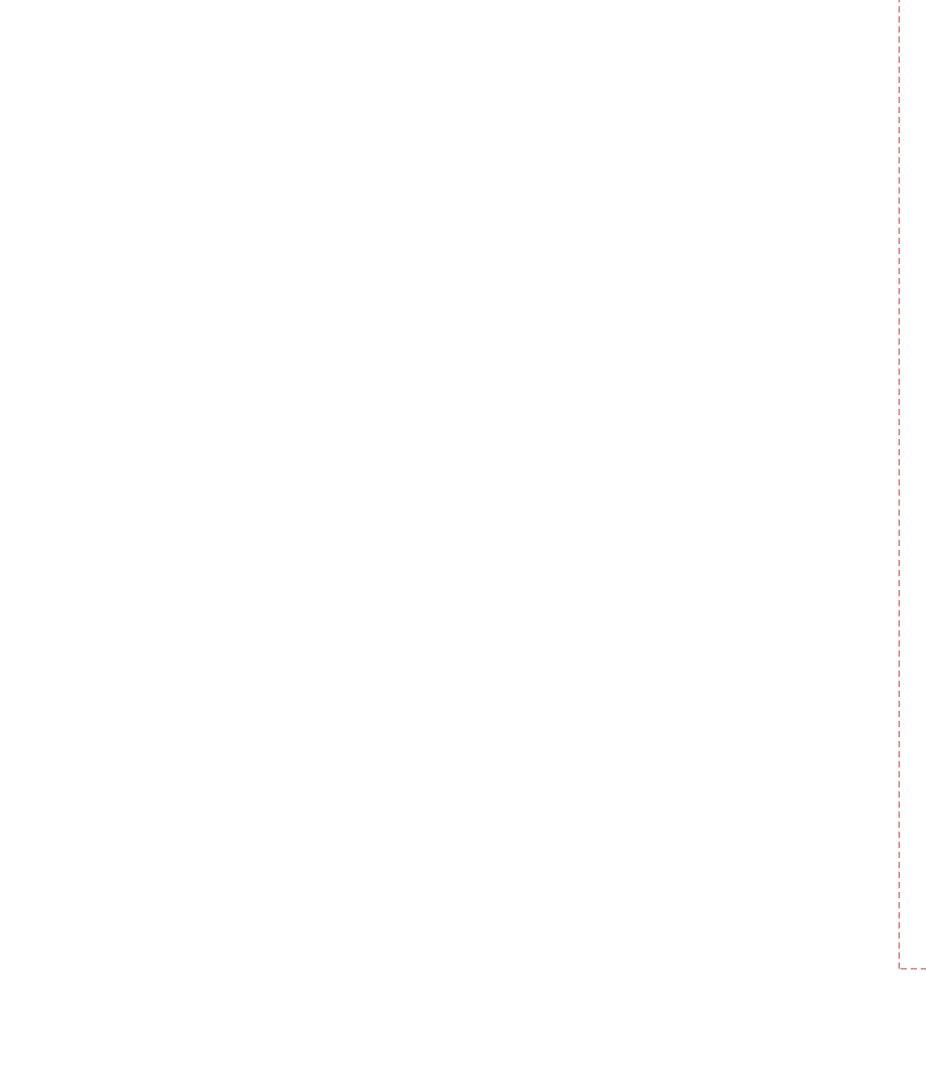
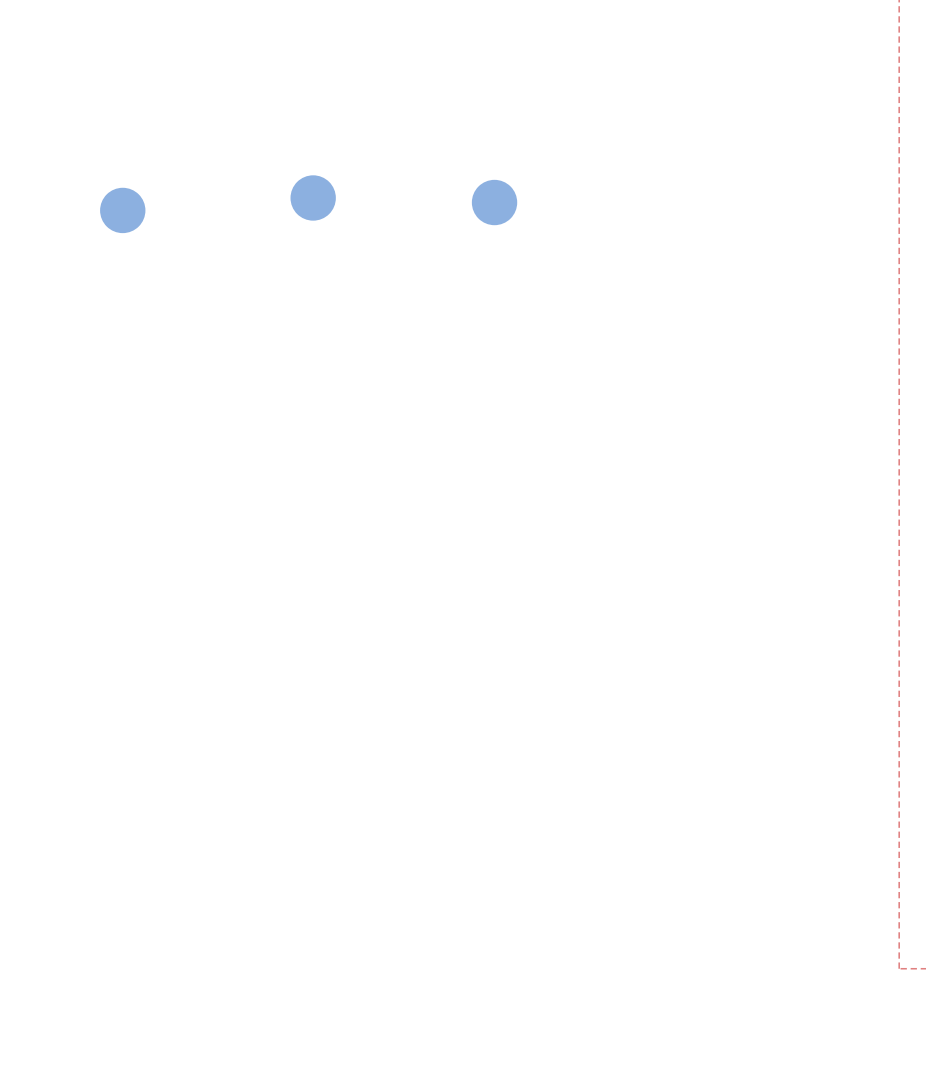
part: none -> (313, 197)
part: none -> (494, 202)
part: none -> (122, 210)

